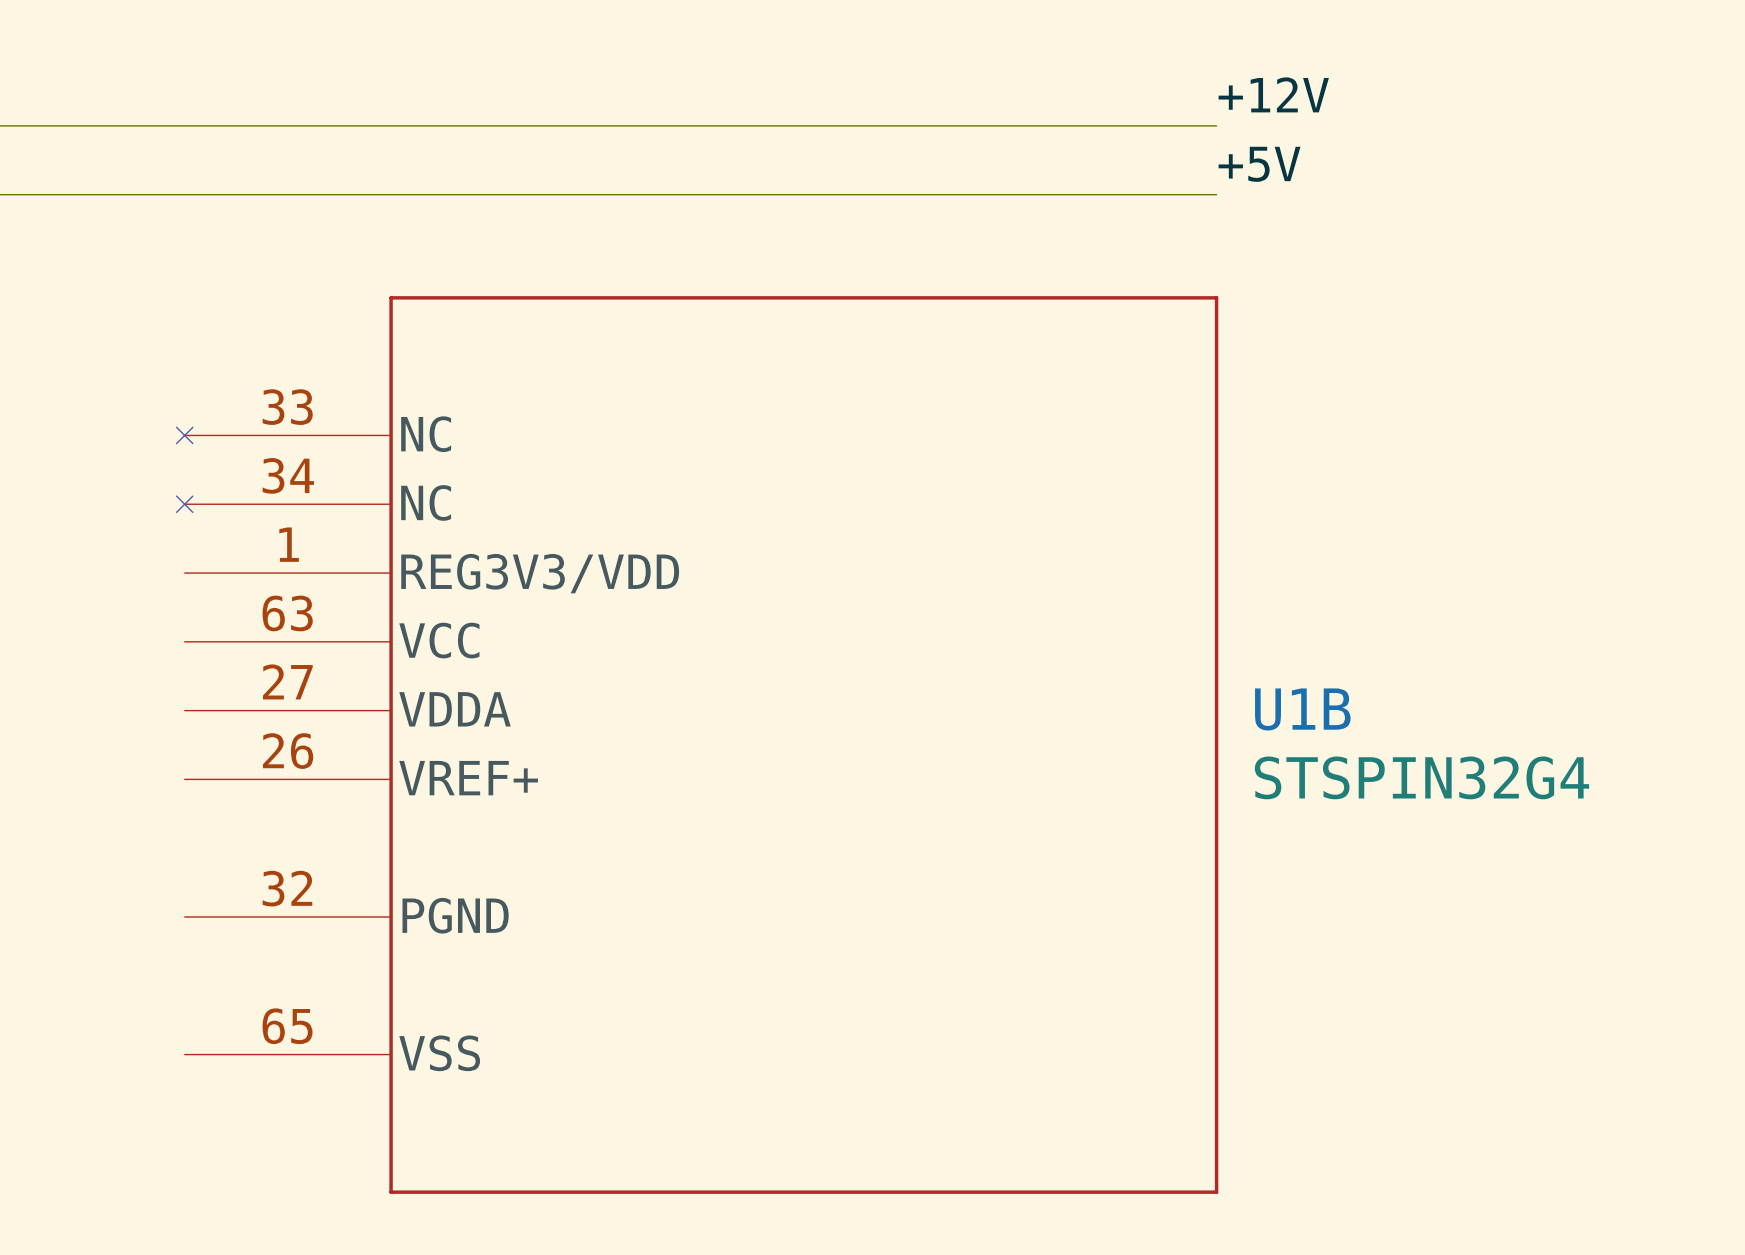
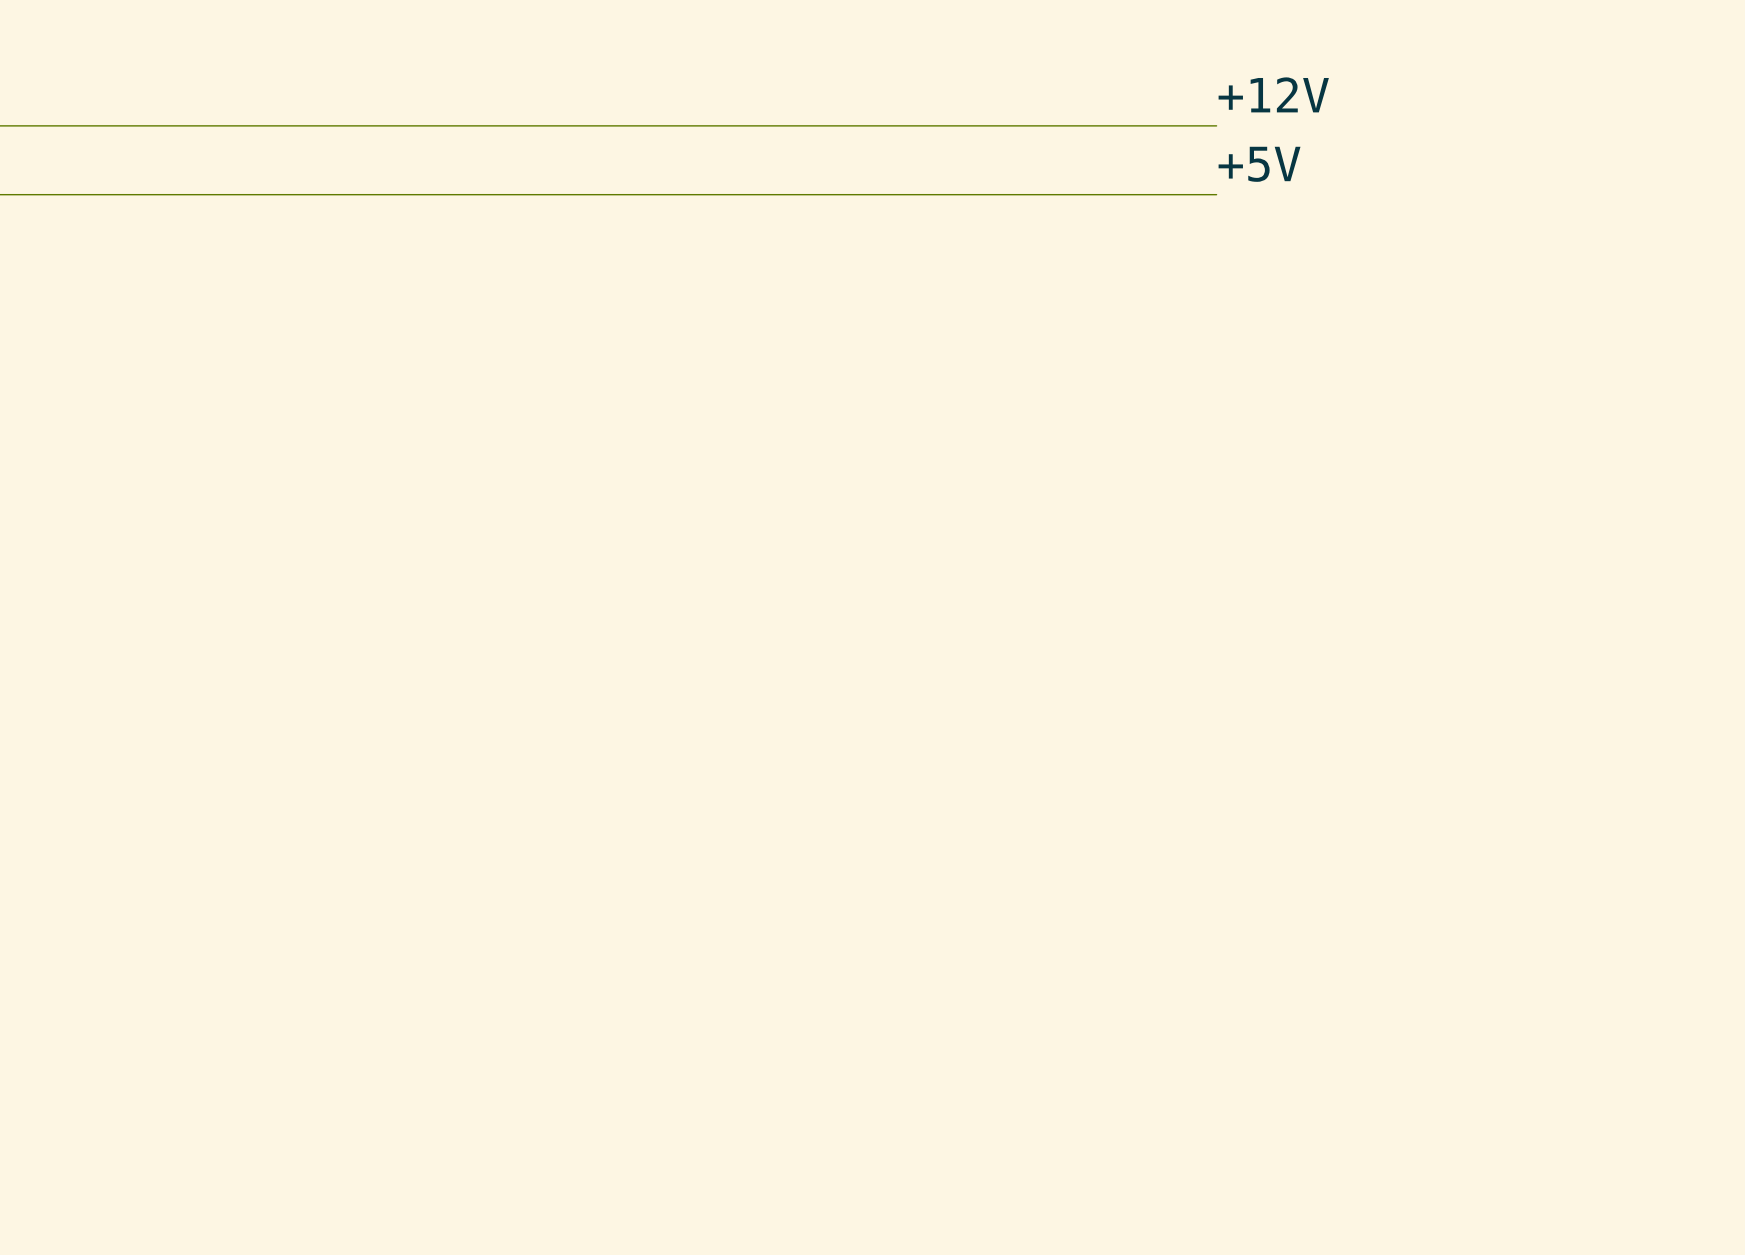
U1B: STSPIN32G4 (697, 745) -> none

